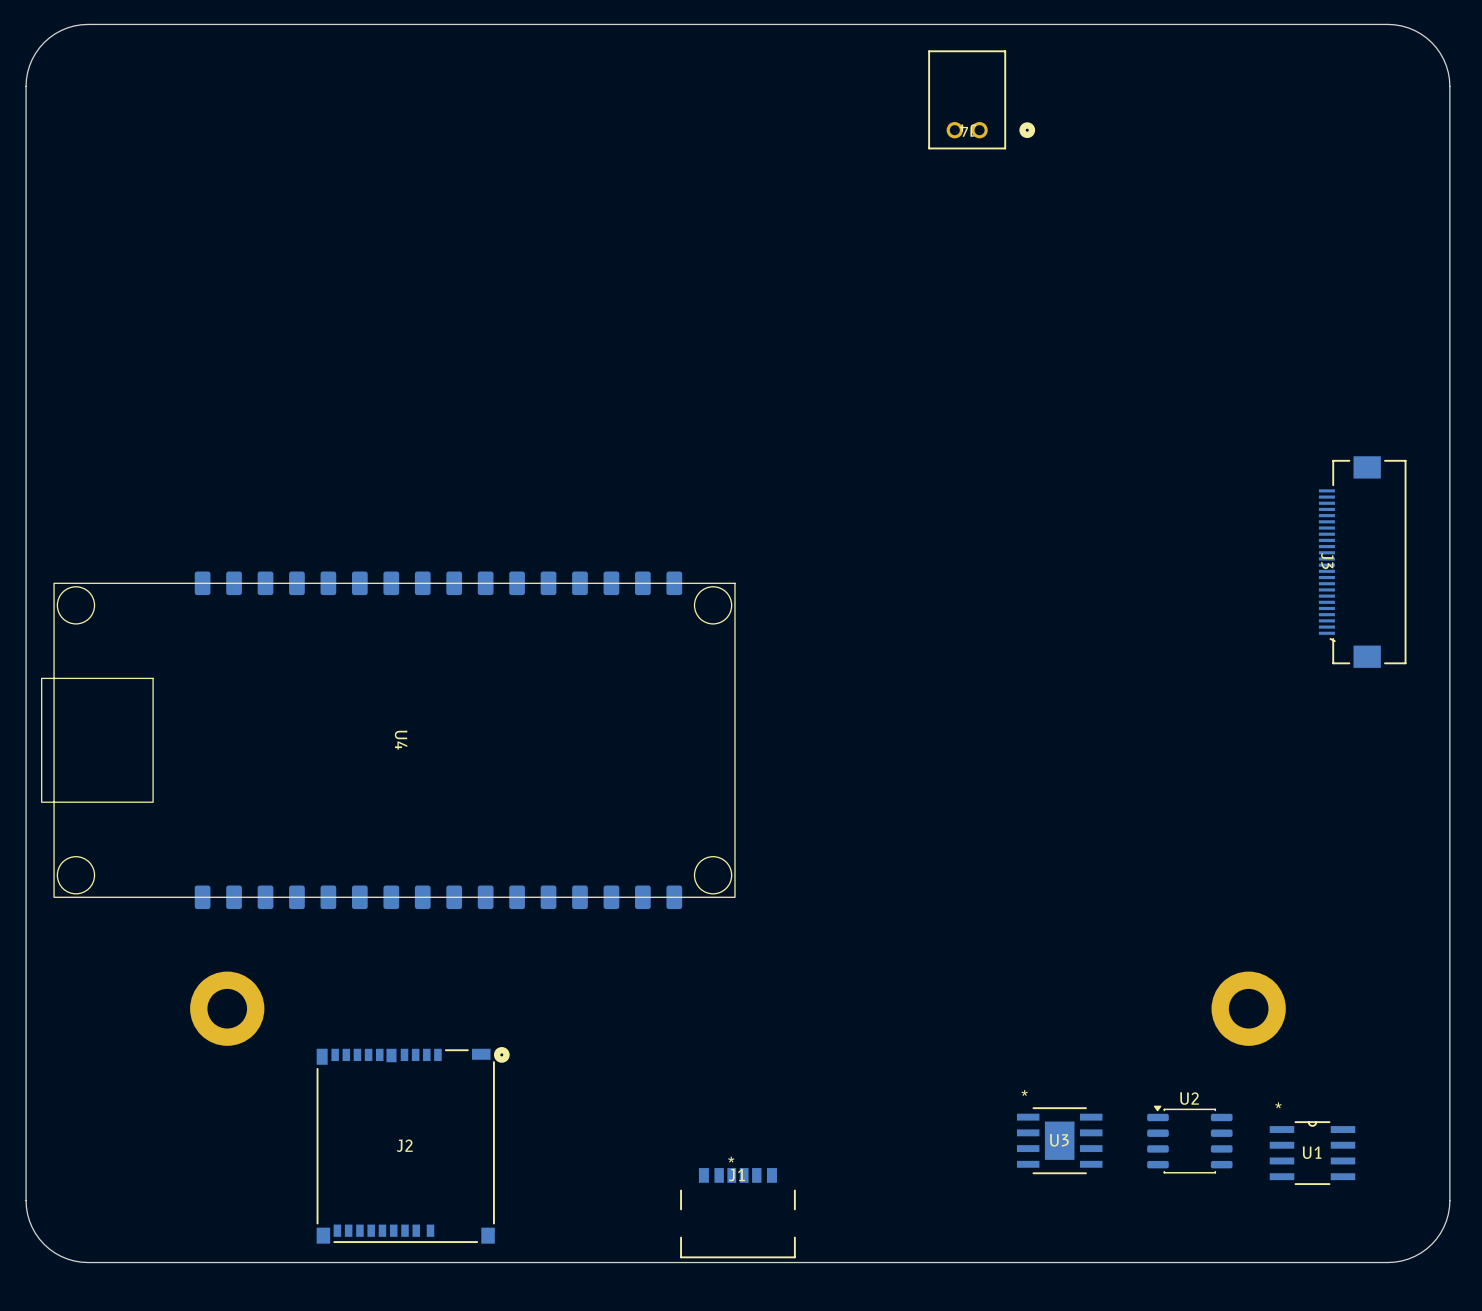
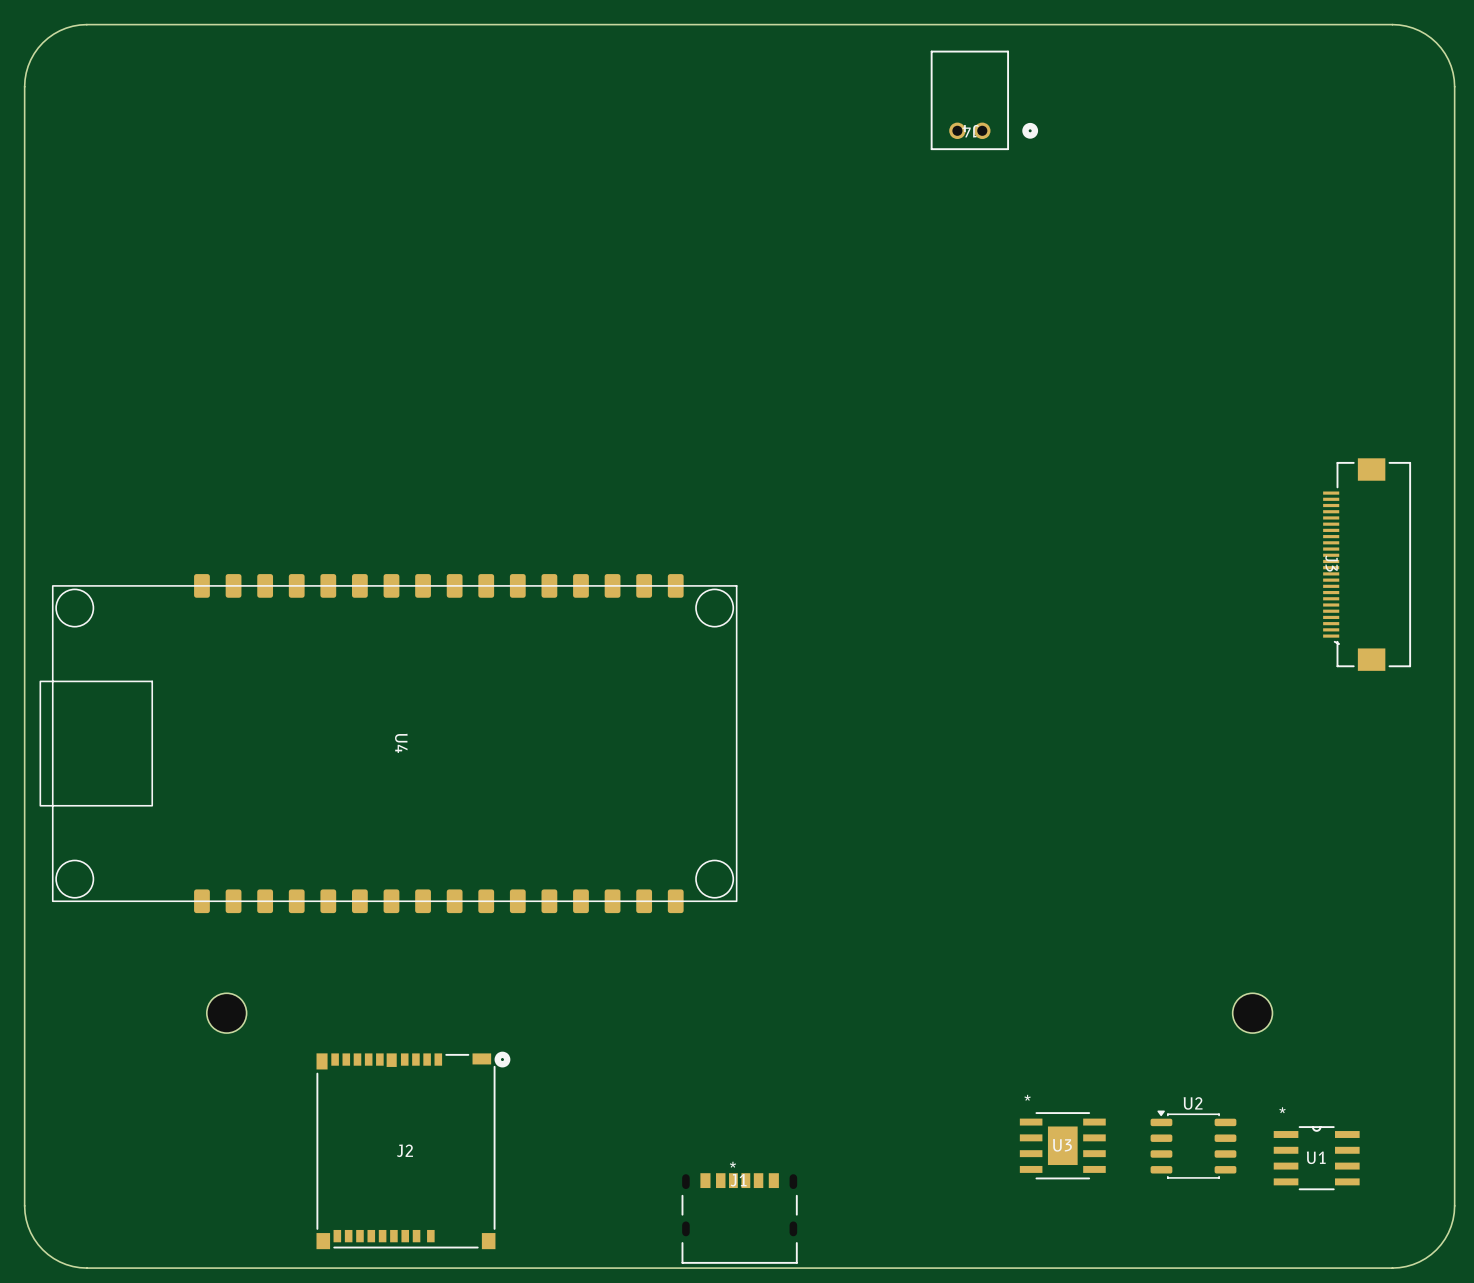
part footprint: [190, 971, 265, 1046] -> [206, 993, 247, 1034]
part footprint: [1211, 971, 1286, 1046] -> [1232, 993, 1273, 1034]

